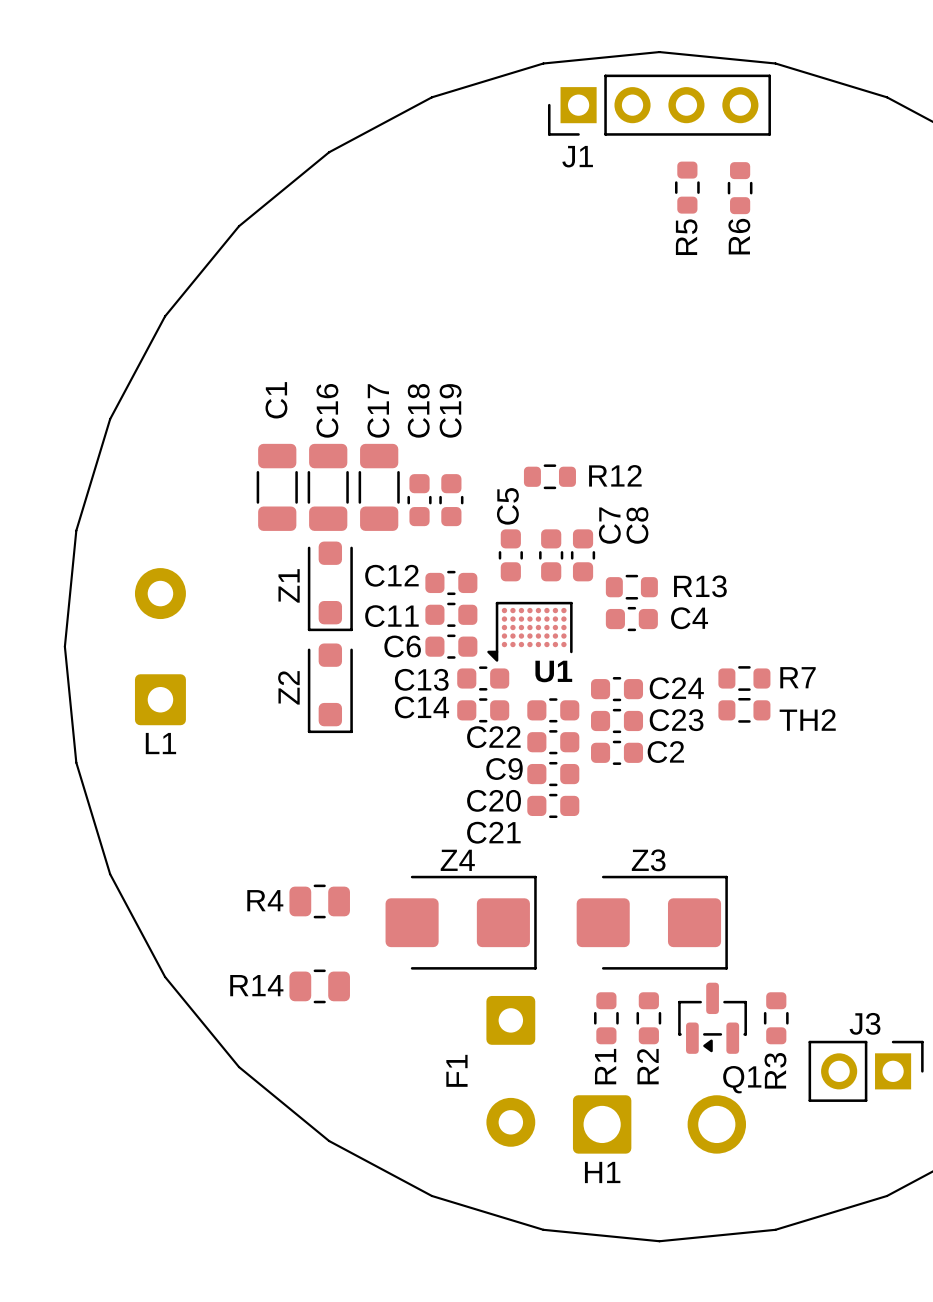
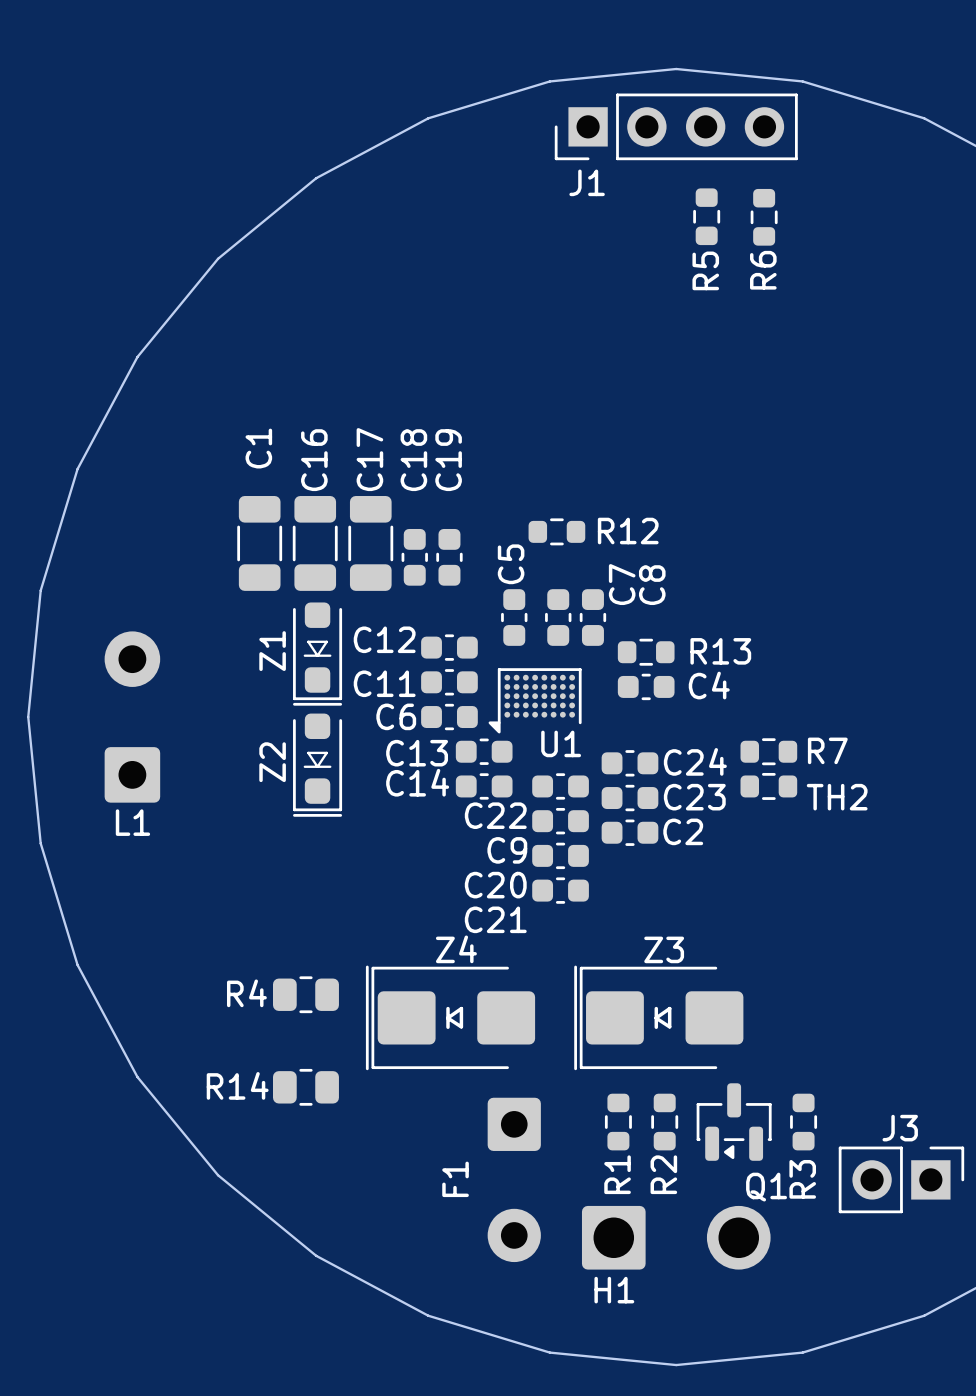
Z1 footprint: [307, 541, 353, 632] -> [293, 602, 343, 706]
Z2 footprint: [307, 643, 353, 734] -> [293, 713, 343, 817]
Z4 footprint: [385, 875, 537, 970] -> [365, 965, 536, 1071]
Z3 footprint: [576, 875, 728, 970] -> [574, 965, 744, 1071]

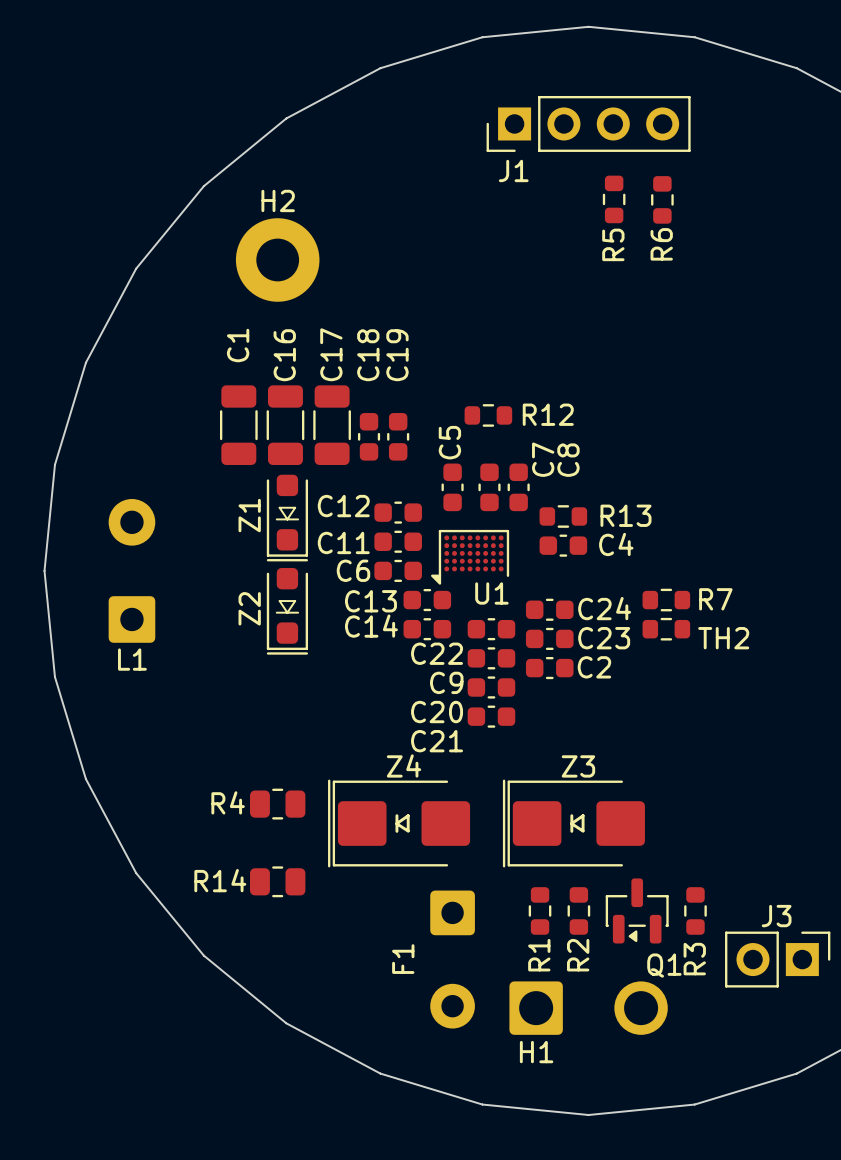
J1 position: (676, 126) -> (588, 123)
R5 position: (706, 216) -> (614, 199)
R6 position: (764, 217) -> (662, 199)
H2: none -> (277, 259)

